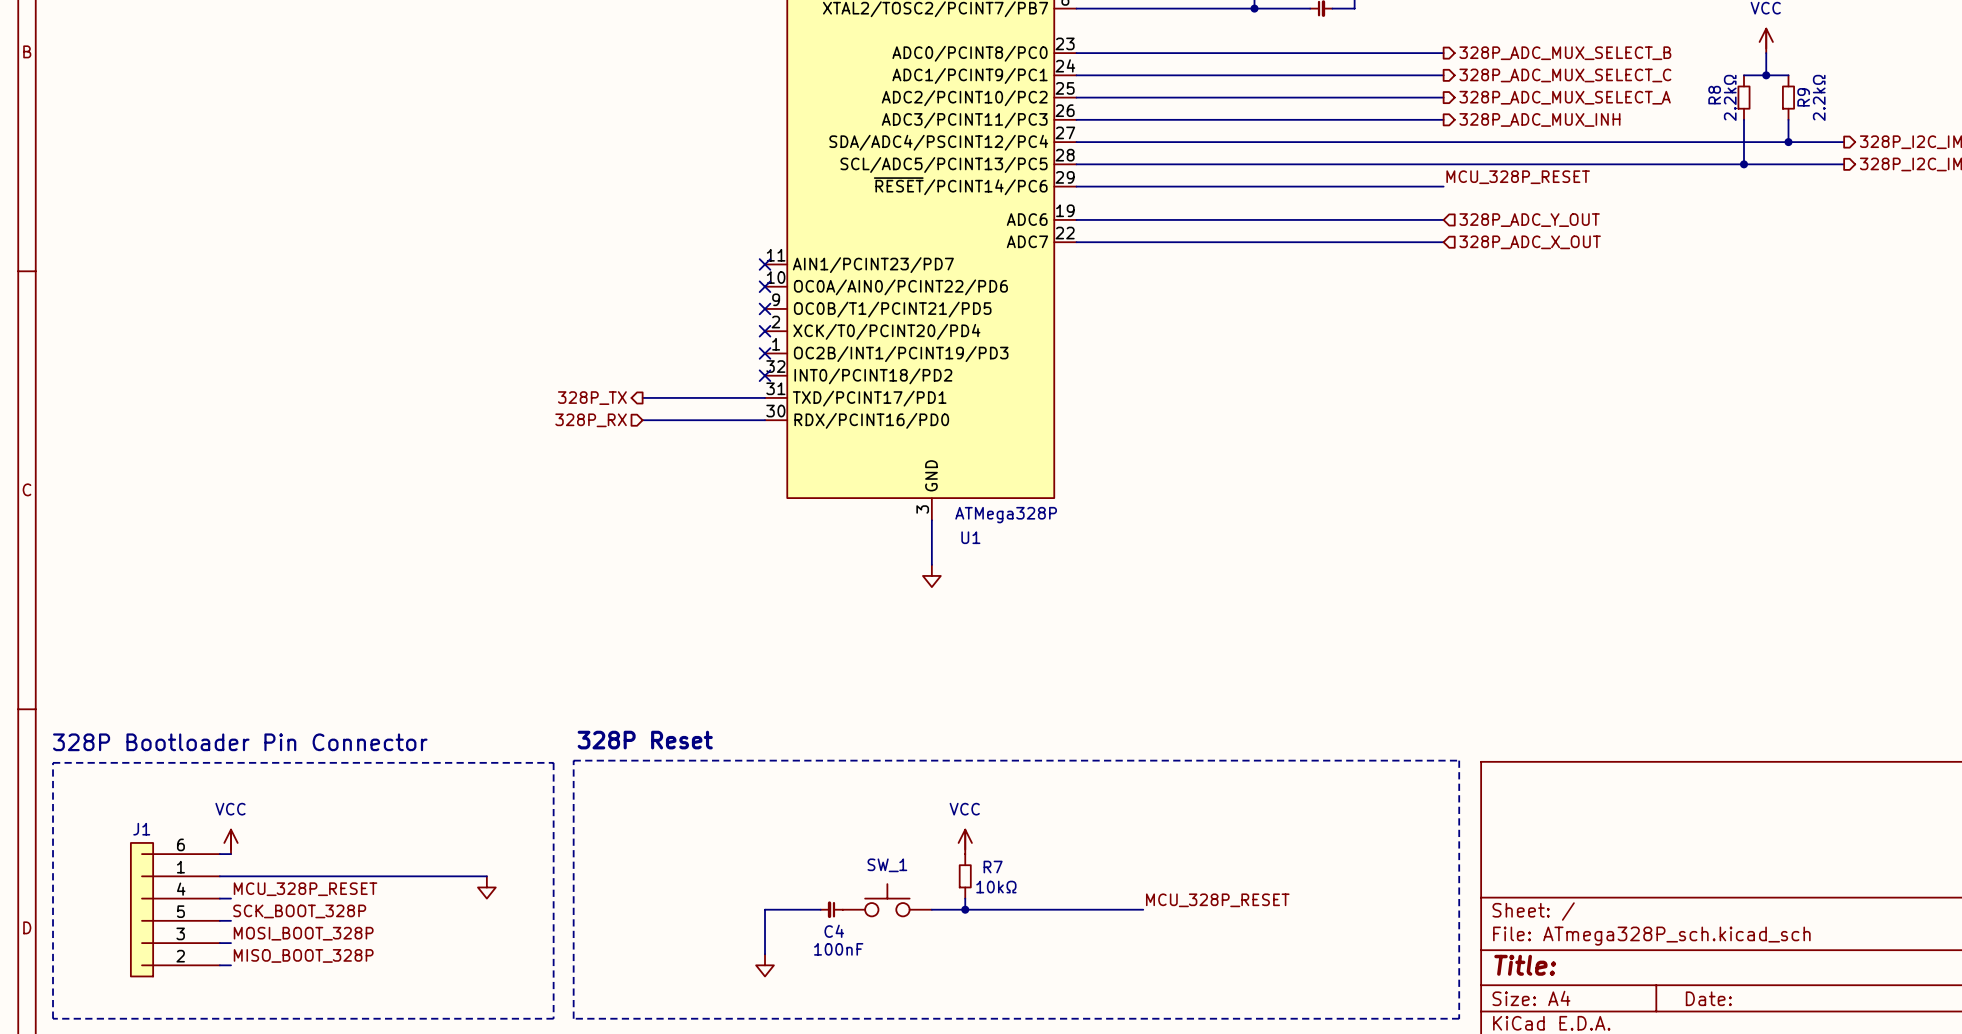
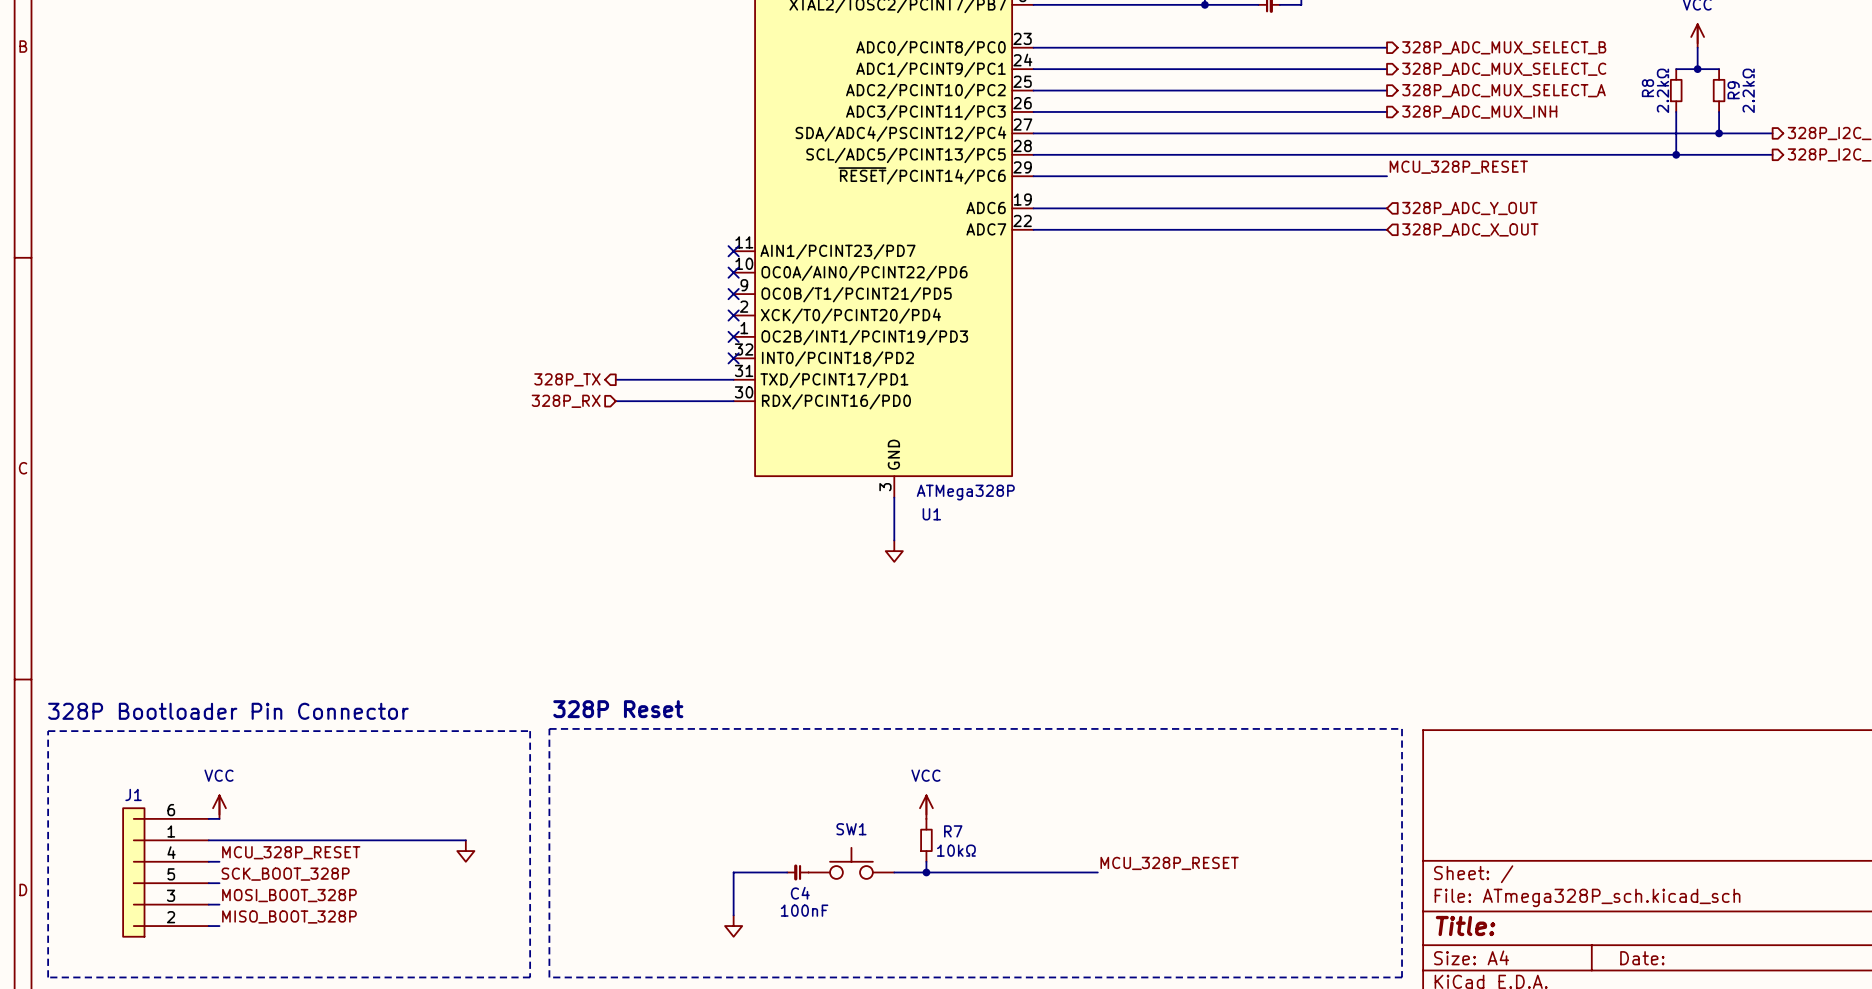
SW_1 name: SW_1 (887, 865) -> SW1 (851, 829)

